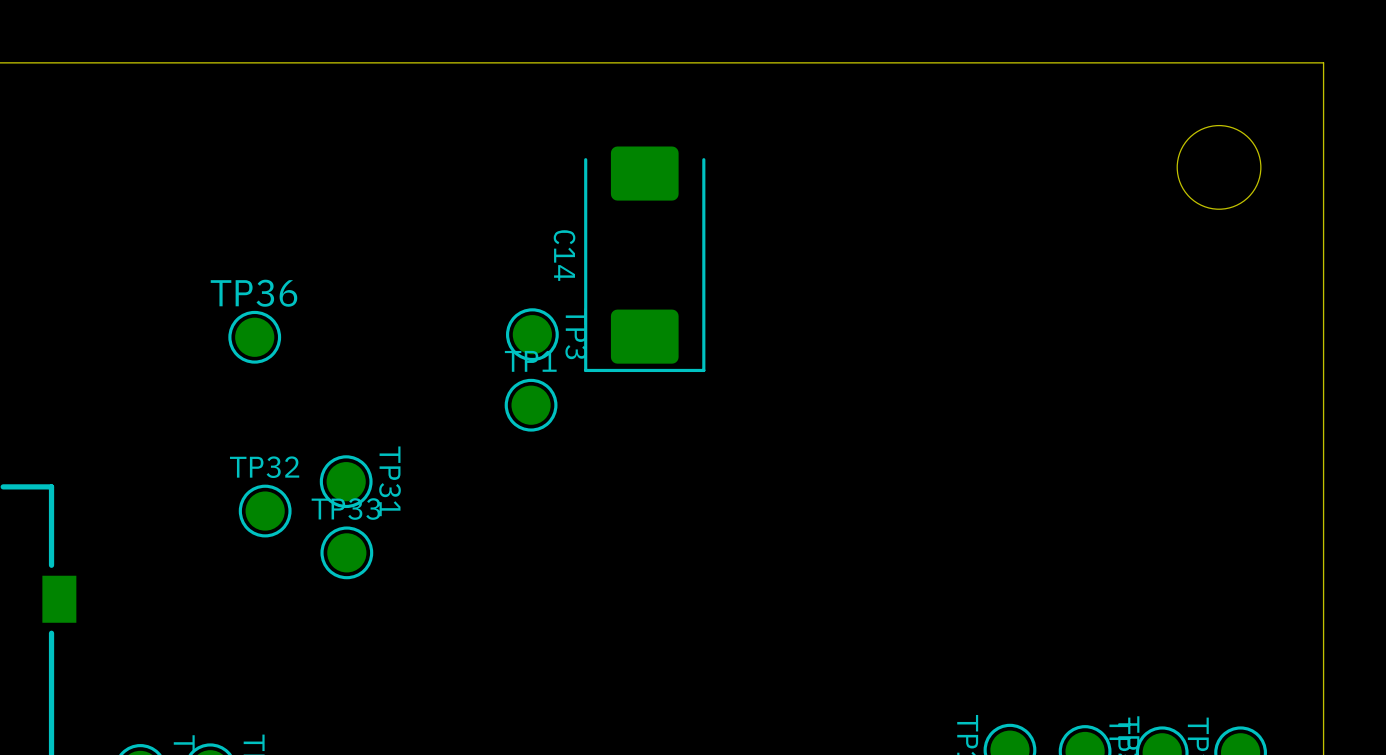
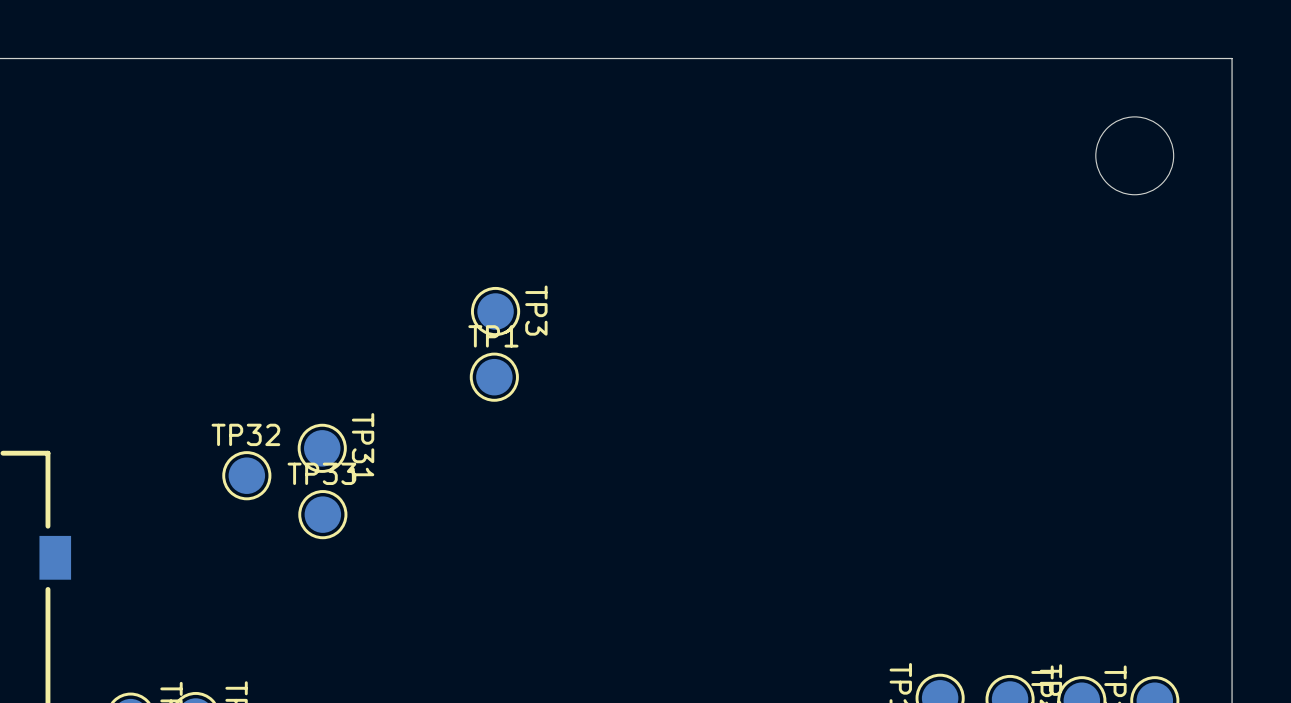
C14: (644, 259) -> none
TP36: (254, 337) -> none

